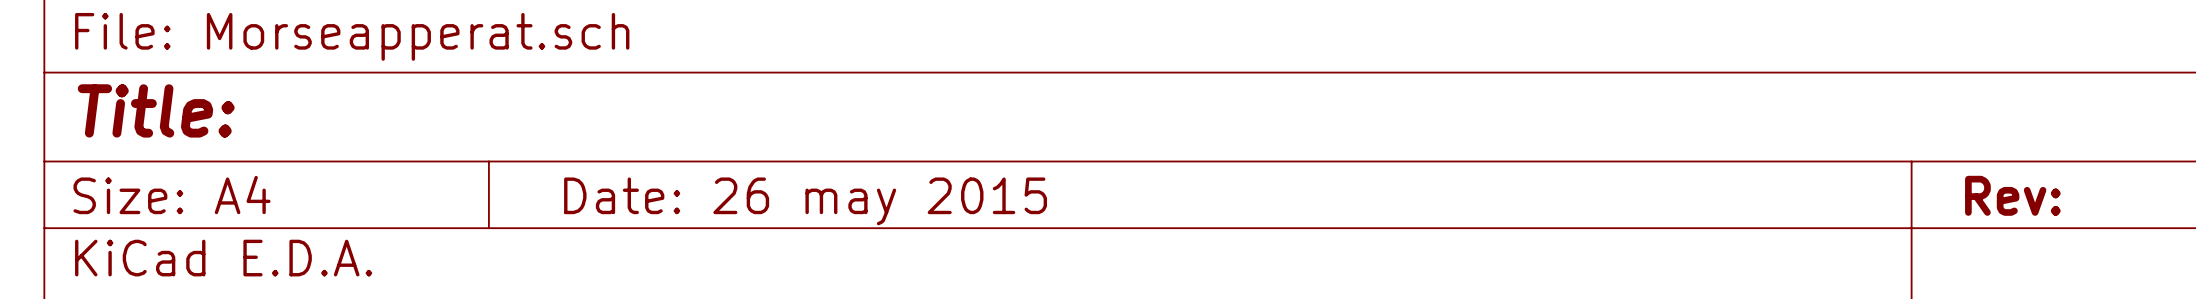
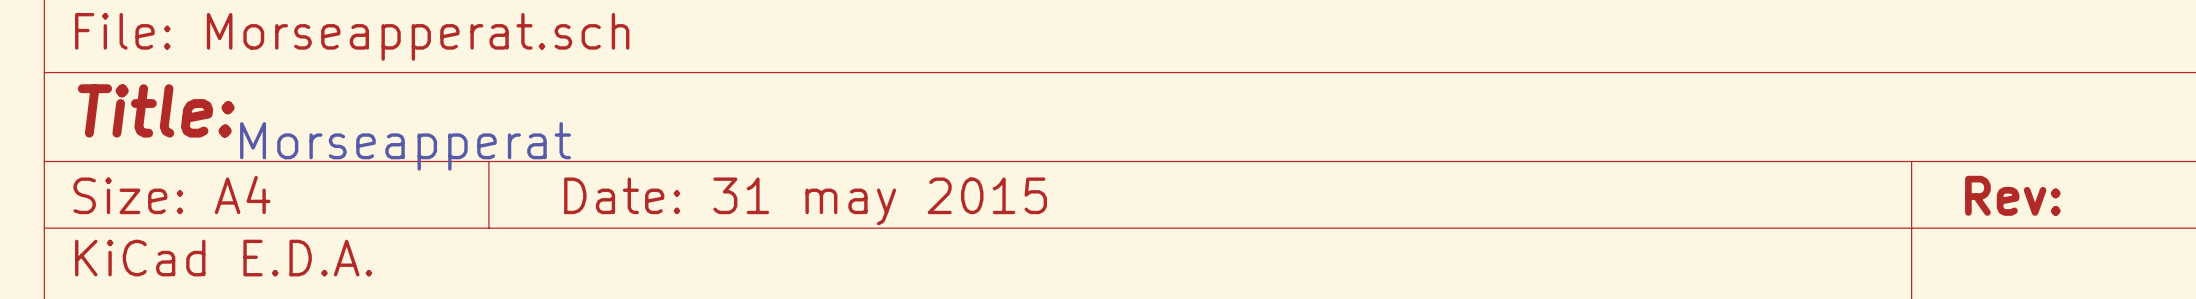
text: none -> Morseapperat (405, 146)
title block: Date: 26 may 2015 (805, 201) -> Date: 31 may 2015 (805, 201)

